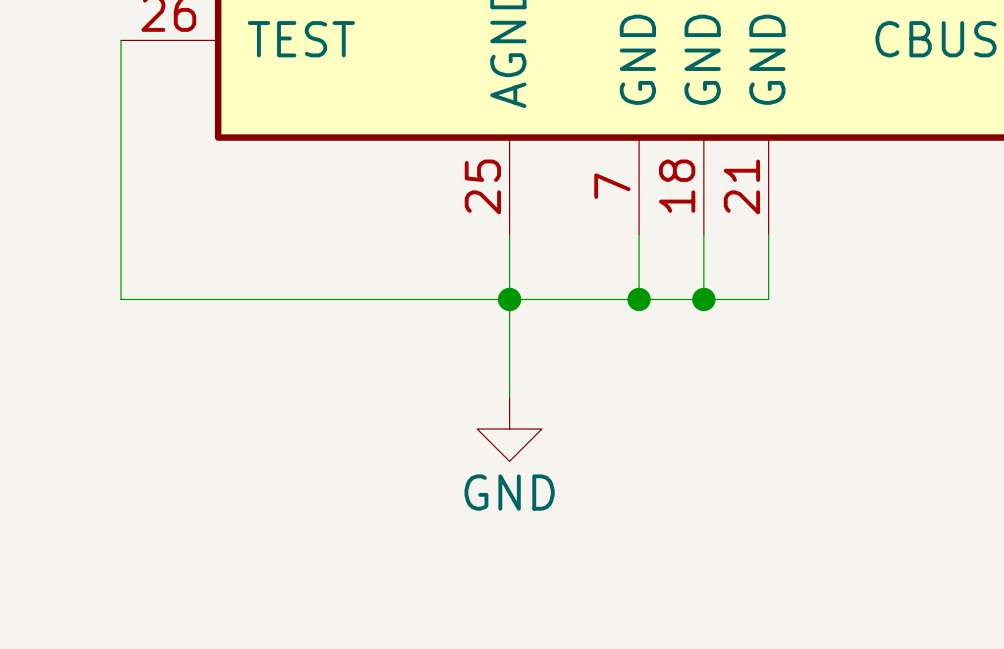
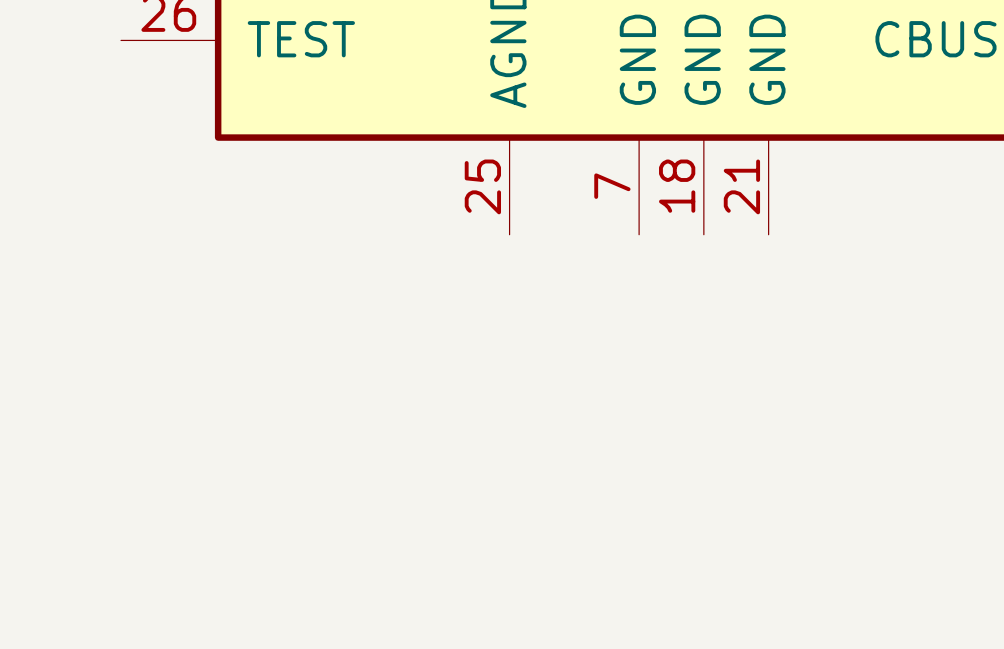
wire: (121, 40) (121, 299) (768, 299) (768, 234) -> none
wire: (509, 234) (509, 396) -> none
wire: (639, 234) (639, 299) -> none
wire: (703, 234) (703, 299) -> none
junction: (509, 299) -> none
junction: (639, 299) -> none
junction: (703, 299) -> none
power symbol: GND (509, 428) -> none

